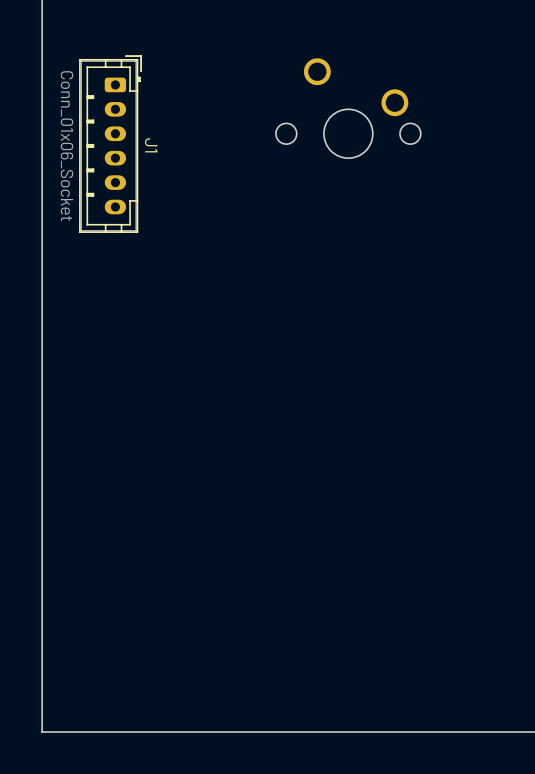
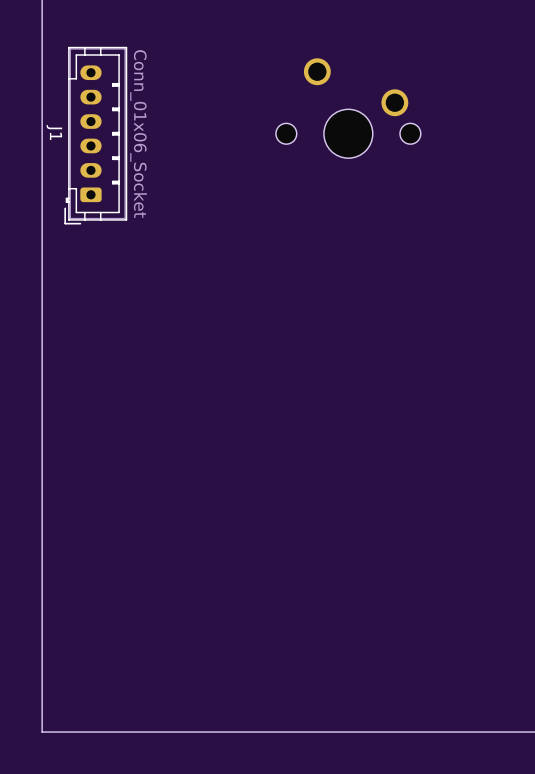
J1 rotation: 0° (110, 144) -> 180° (95, 135)

